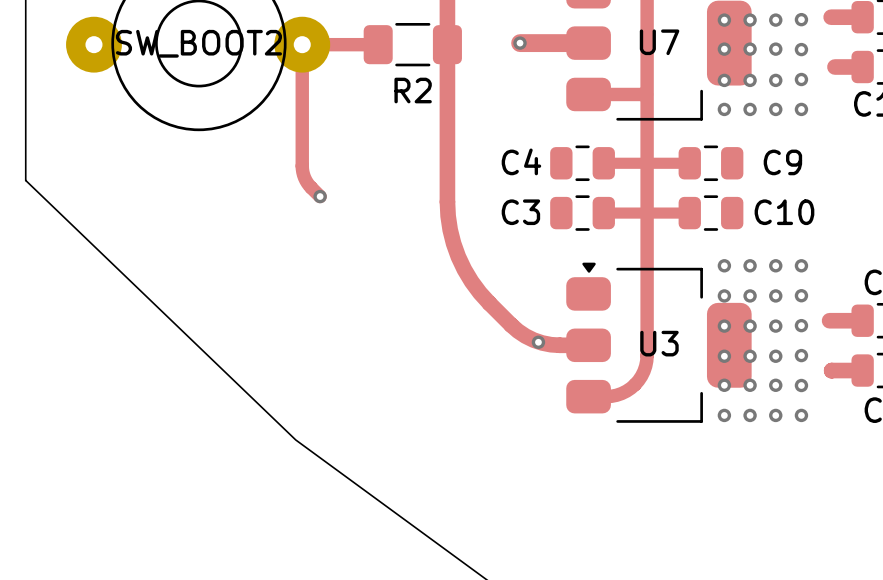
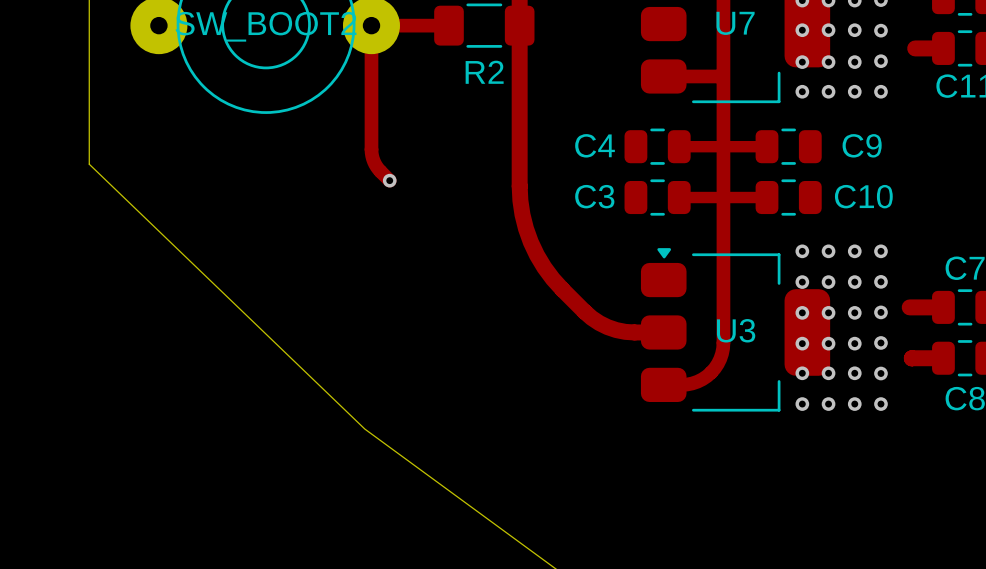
track: (520, 43) (588, 43) -> none
via: (520, 43) -> none
via: (538, 342) -> none

